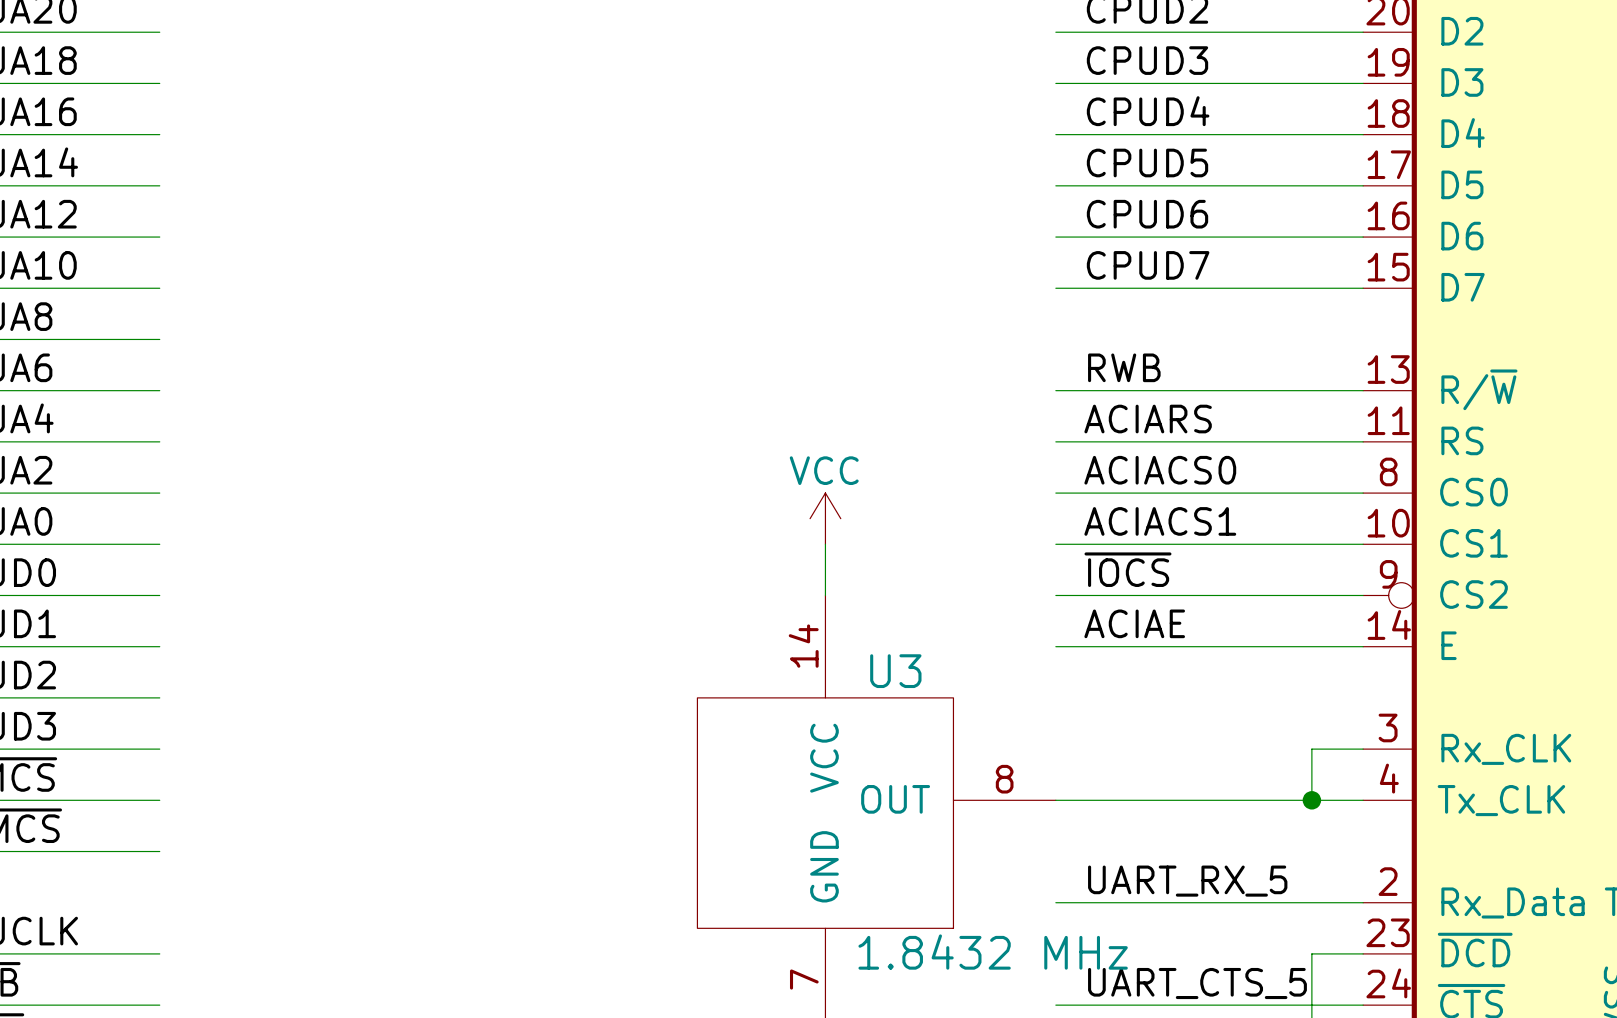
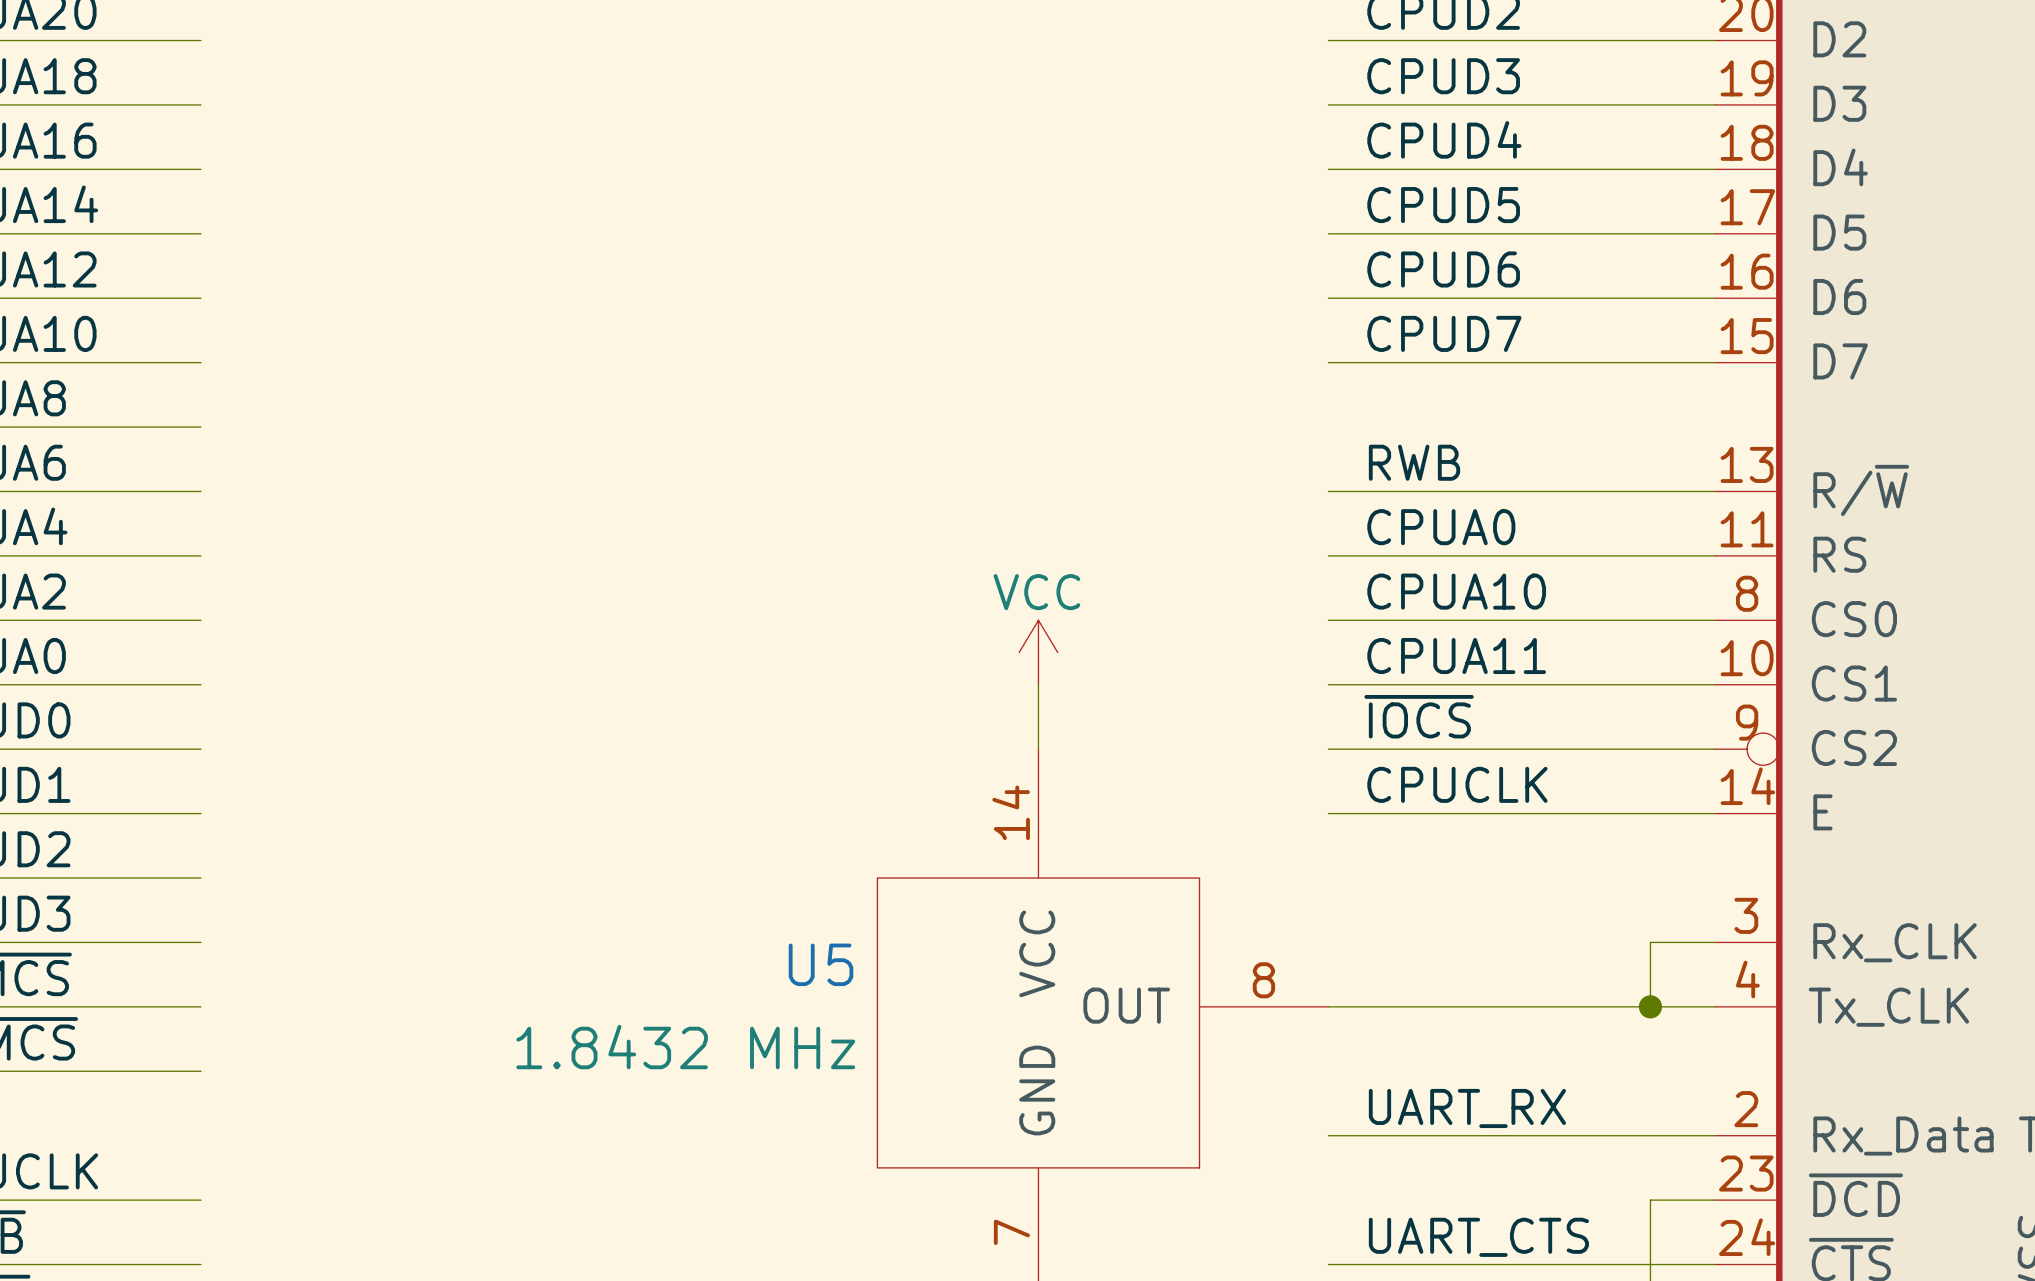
label: ACIARS (1148, 419) -> CPUA0 (1441, 527)
label: ACIACS0 (1160, 470) -> CPUA10 (1456, 591)
label: ACIACS1 (1160, 521) -> CPUA11 (1456, 656)
label: ACIAE (1134, 623) -> CPUCLK (1457, 784)
U3 name: U3 (895, 671) -> U5 (821, 964)
label: UART_RX_5 (1187, 881) -> UART_RX (1467, 1108)
U3 value position: 1.8432 MHz (993, 952) -> 1.8432 MHz (685, 1047)
label: UART_CTS_5 (1197, 983) -> UART_CTS (1478, 1237)

